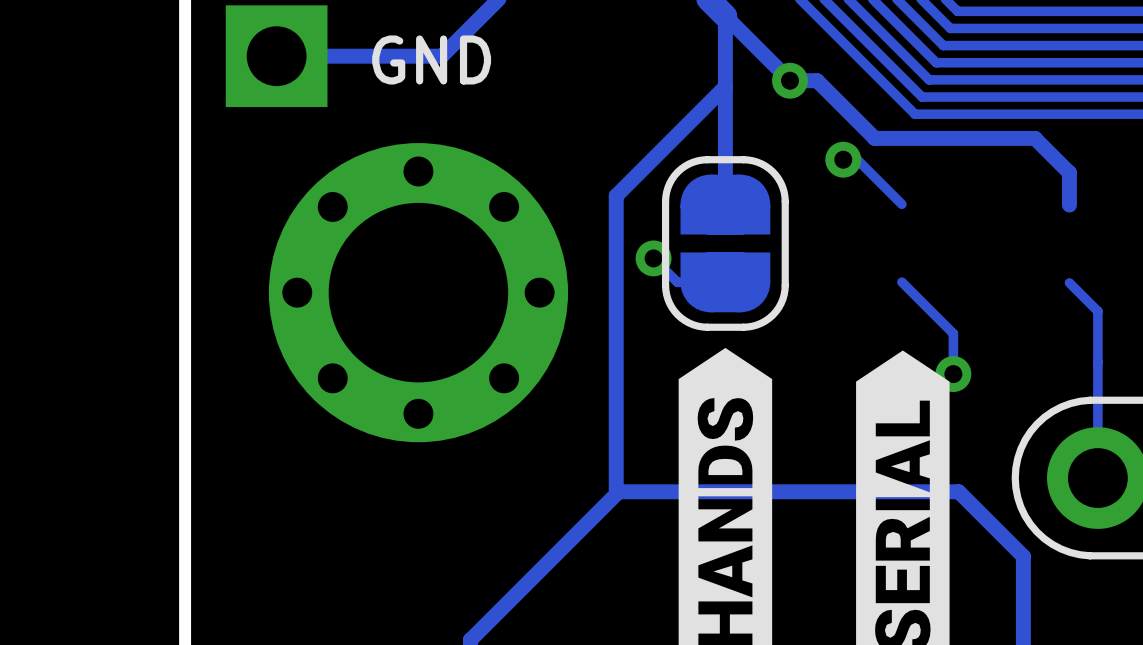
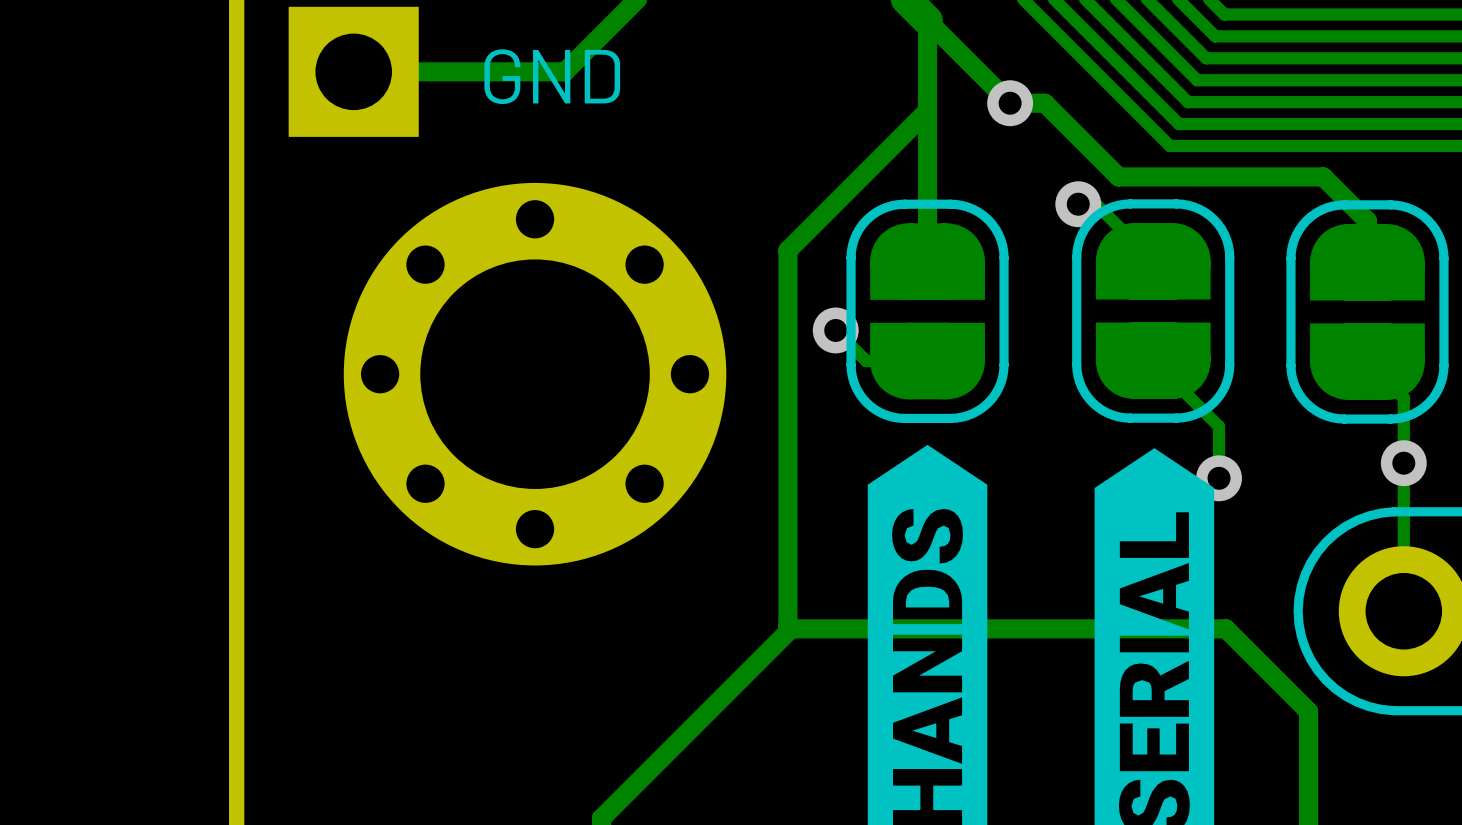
part: none -> (1153, 311)
part: none -> (1367, 311)
via: none -> (1403, 463)

